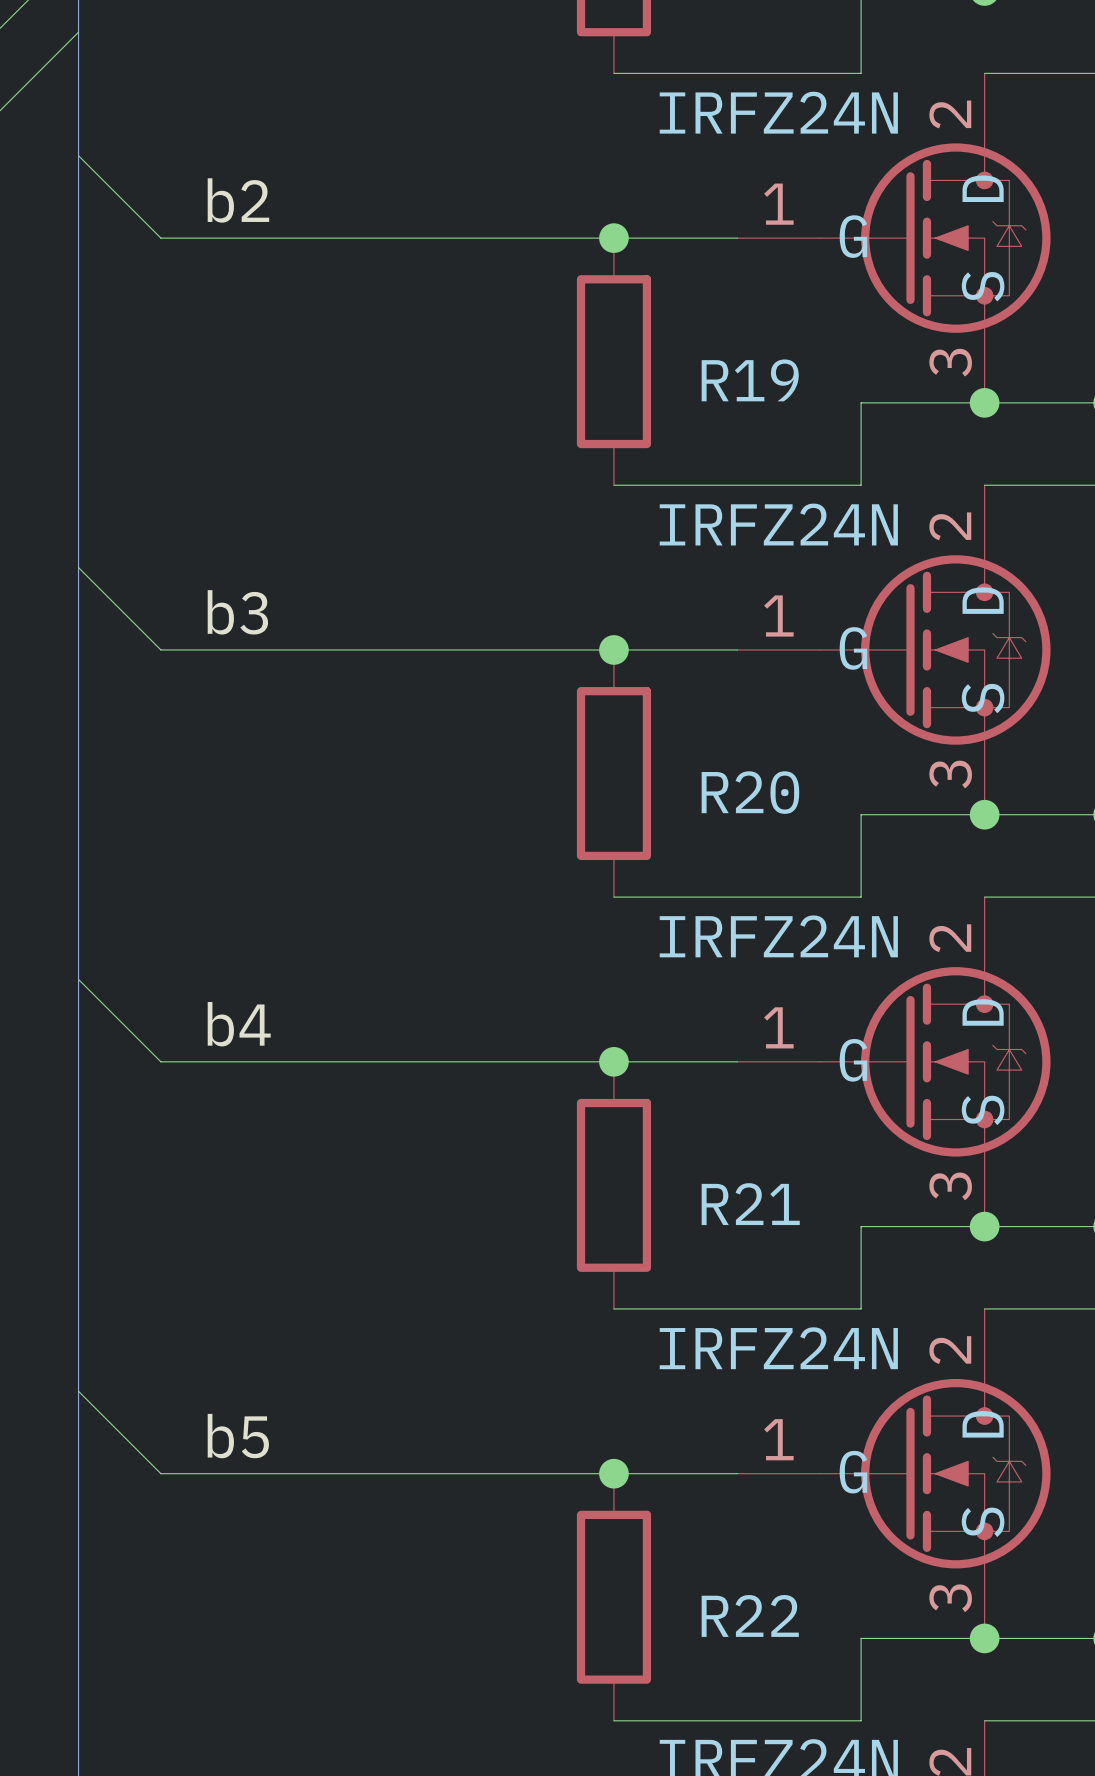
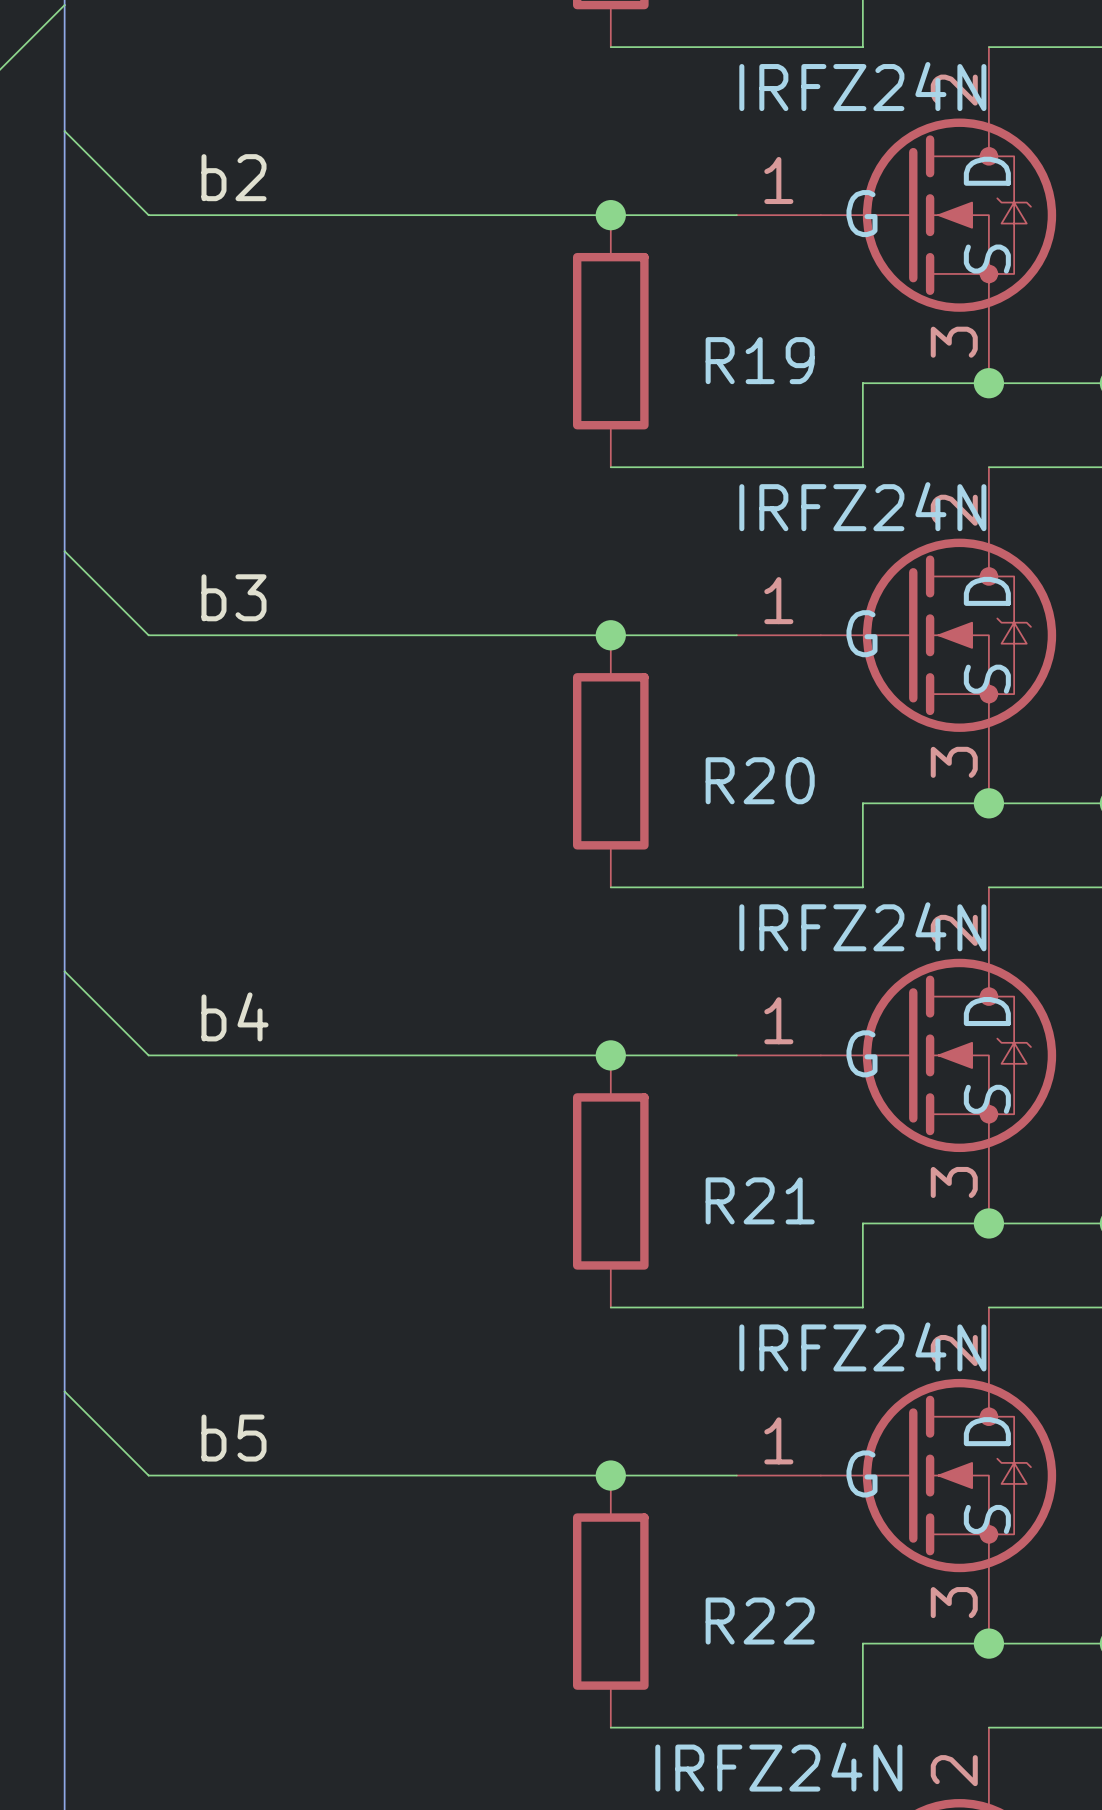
part value position: IRFZ24N (778, 112) -> IRFZ24N (862, 86)
part value position: IRFZ24N (778, 524) -> IRFZ24N (862, 506)
part value position: IRFZ24N (778, 936) -> IRFZ24N (862, 926)
part value position: IRFZ24N (778, 1348) -> IRFZ24N (862, 1346)

